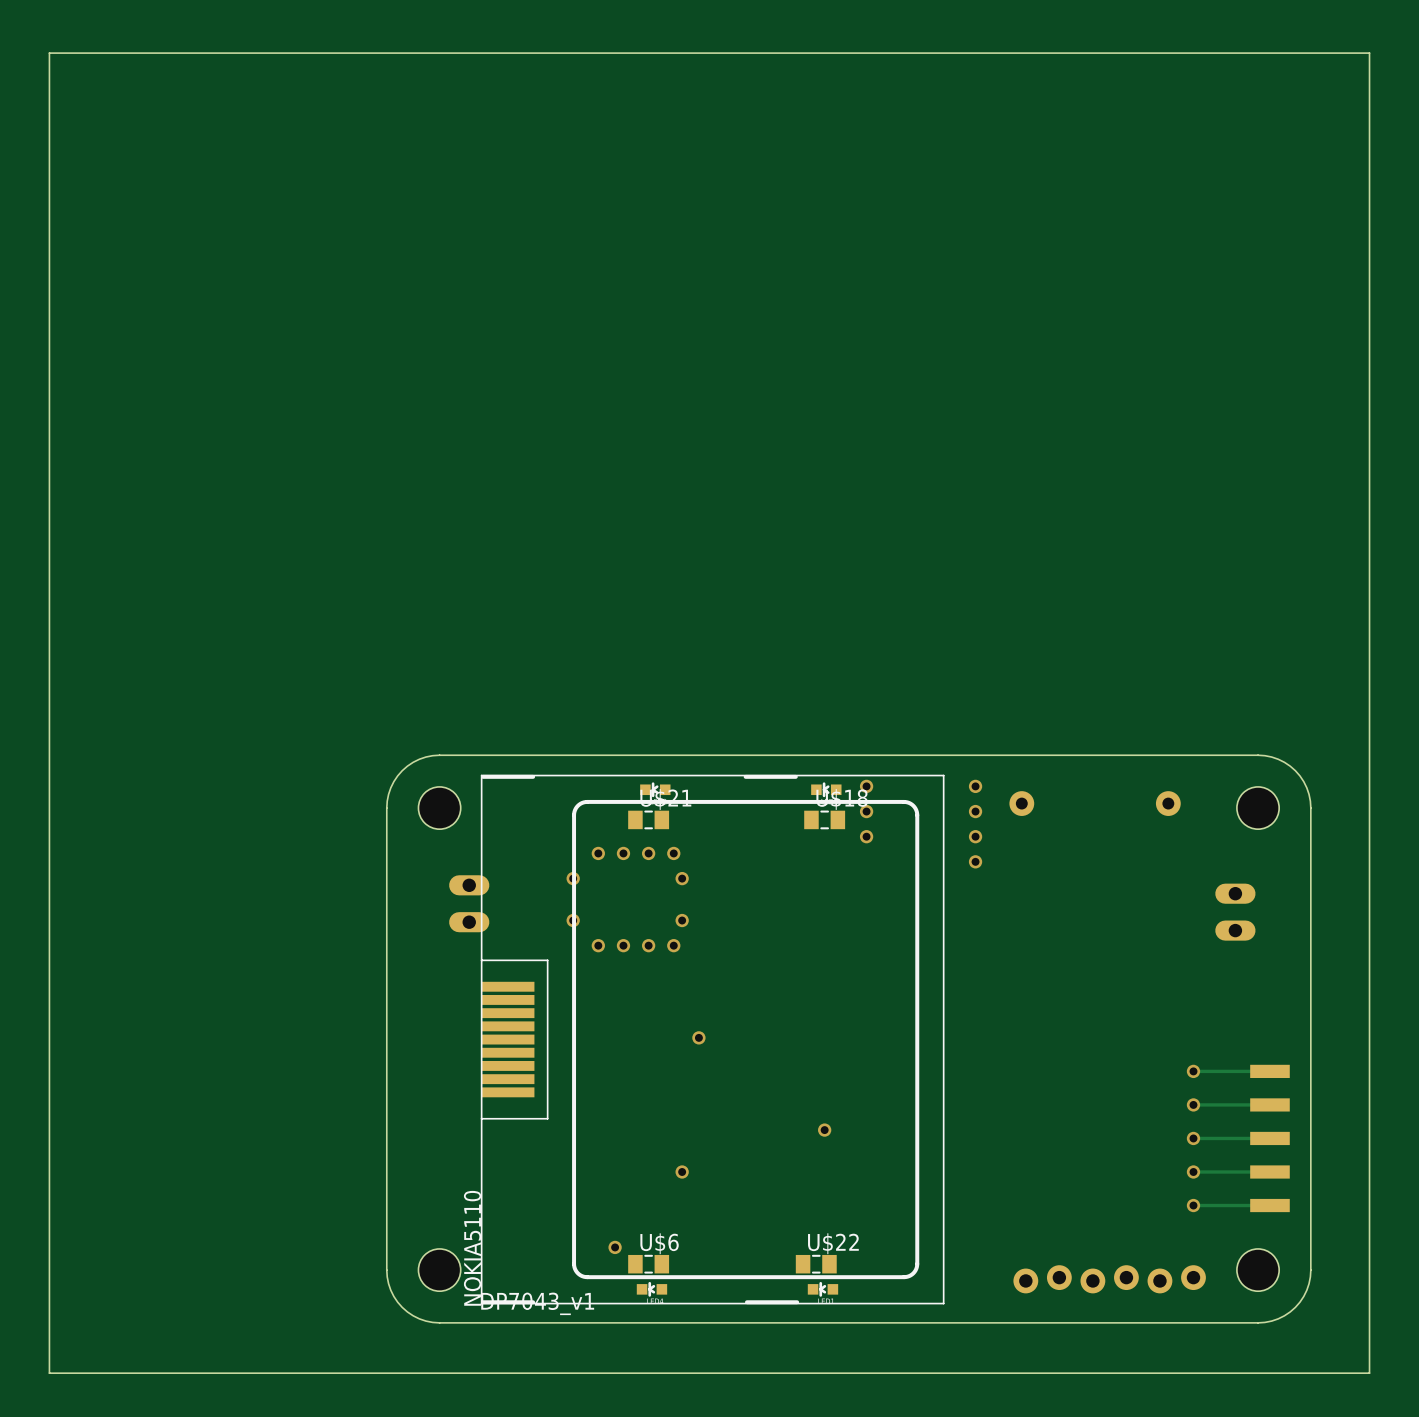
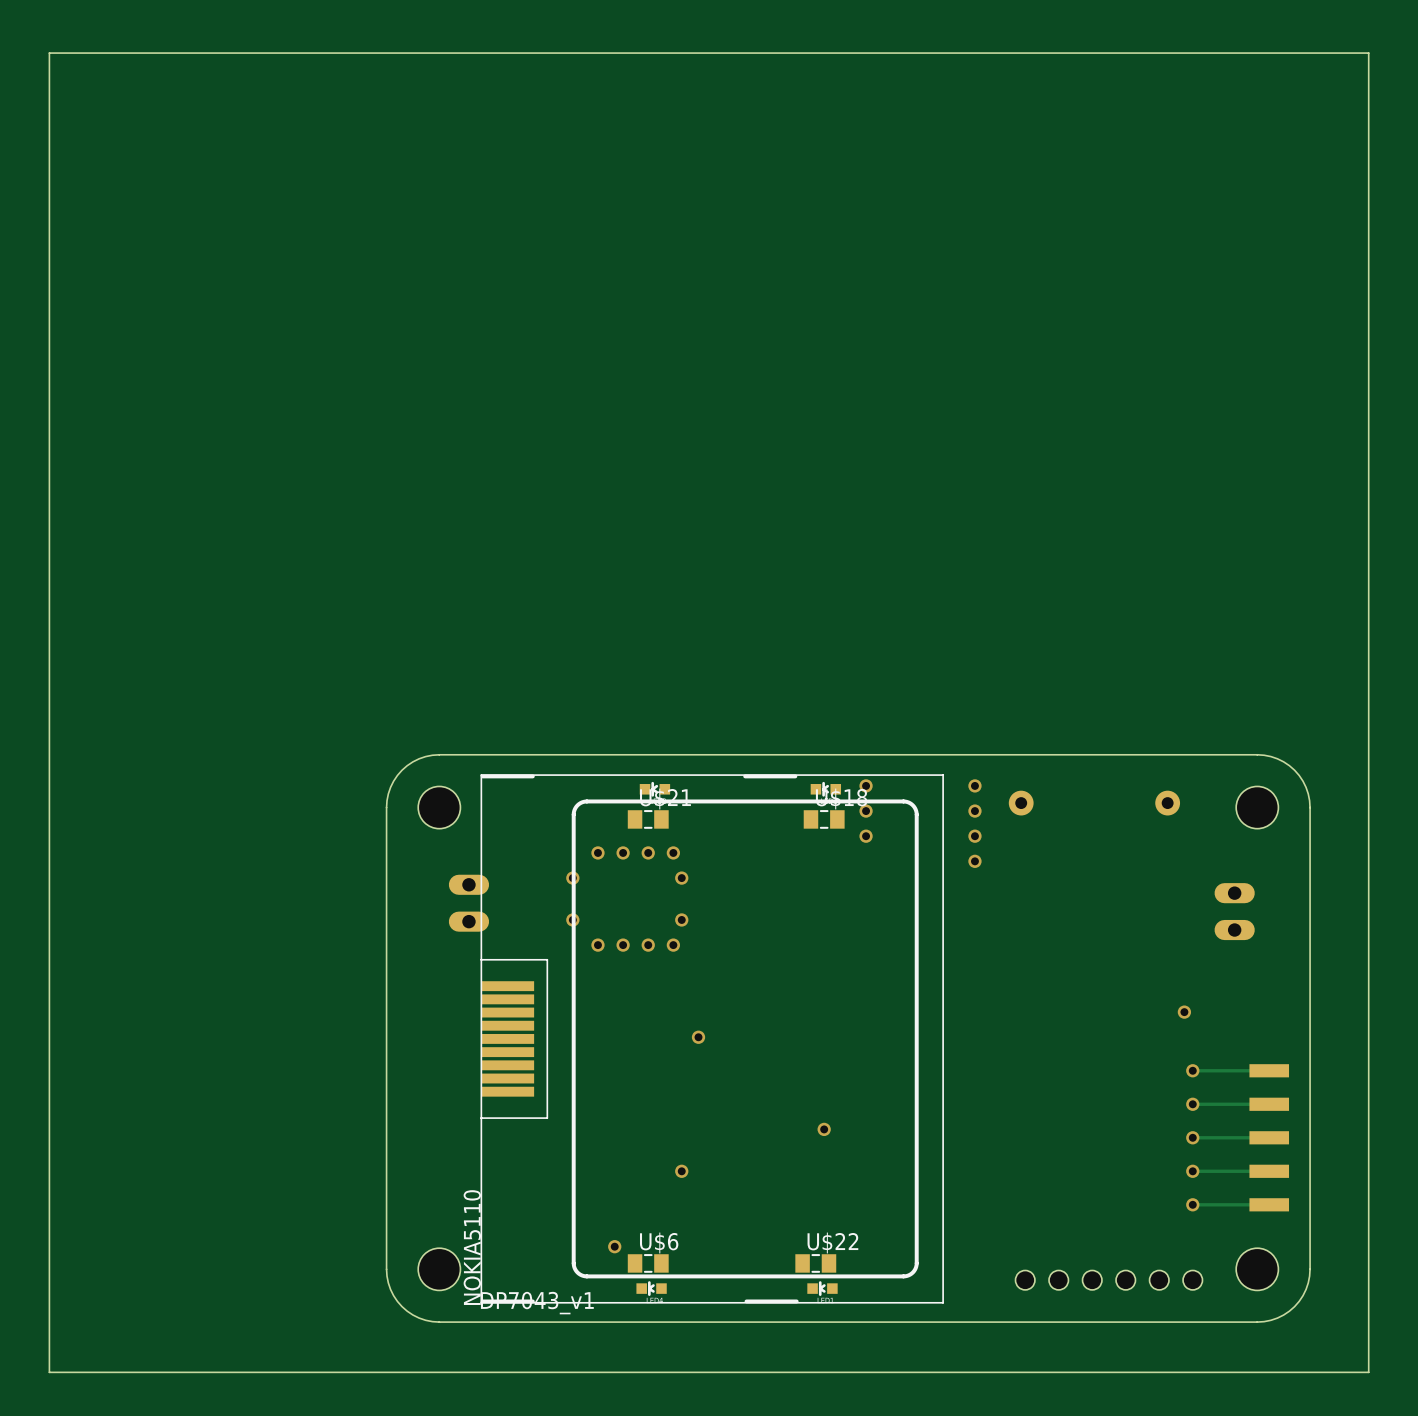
via: none -> (1184, 1012)
part footprint: [1013, 1265, 1206, 1294] -> [1015, 1270, 1203, 1290]

